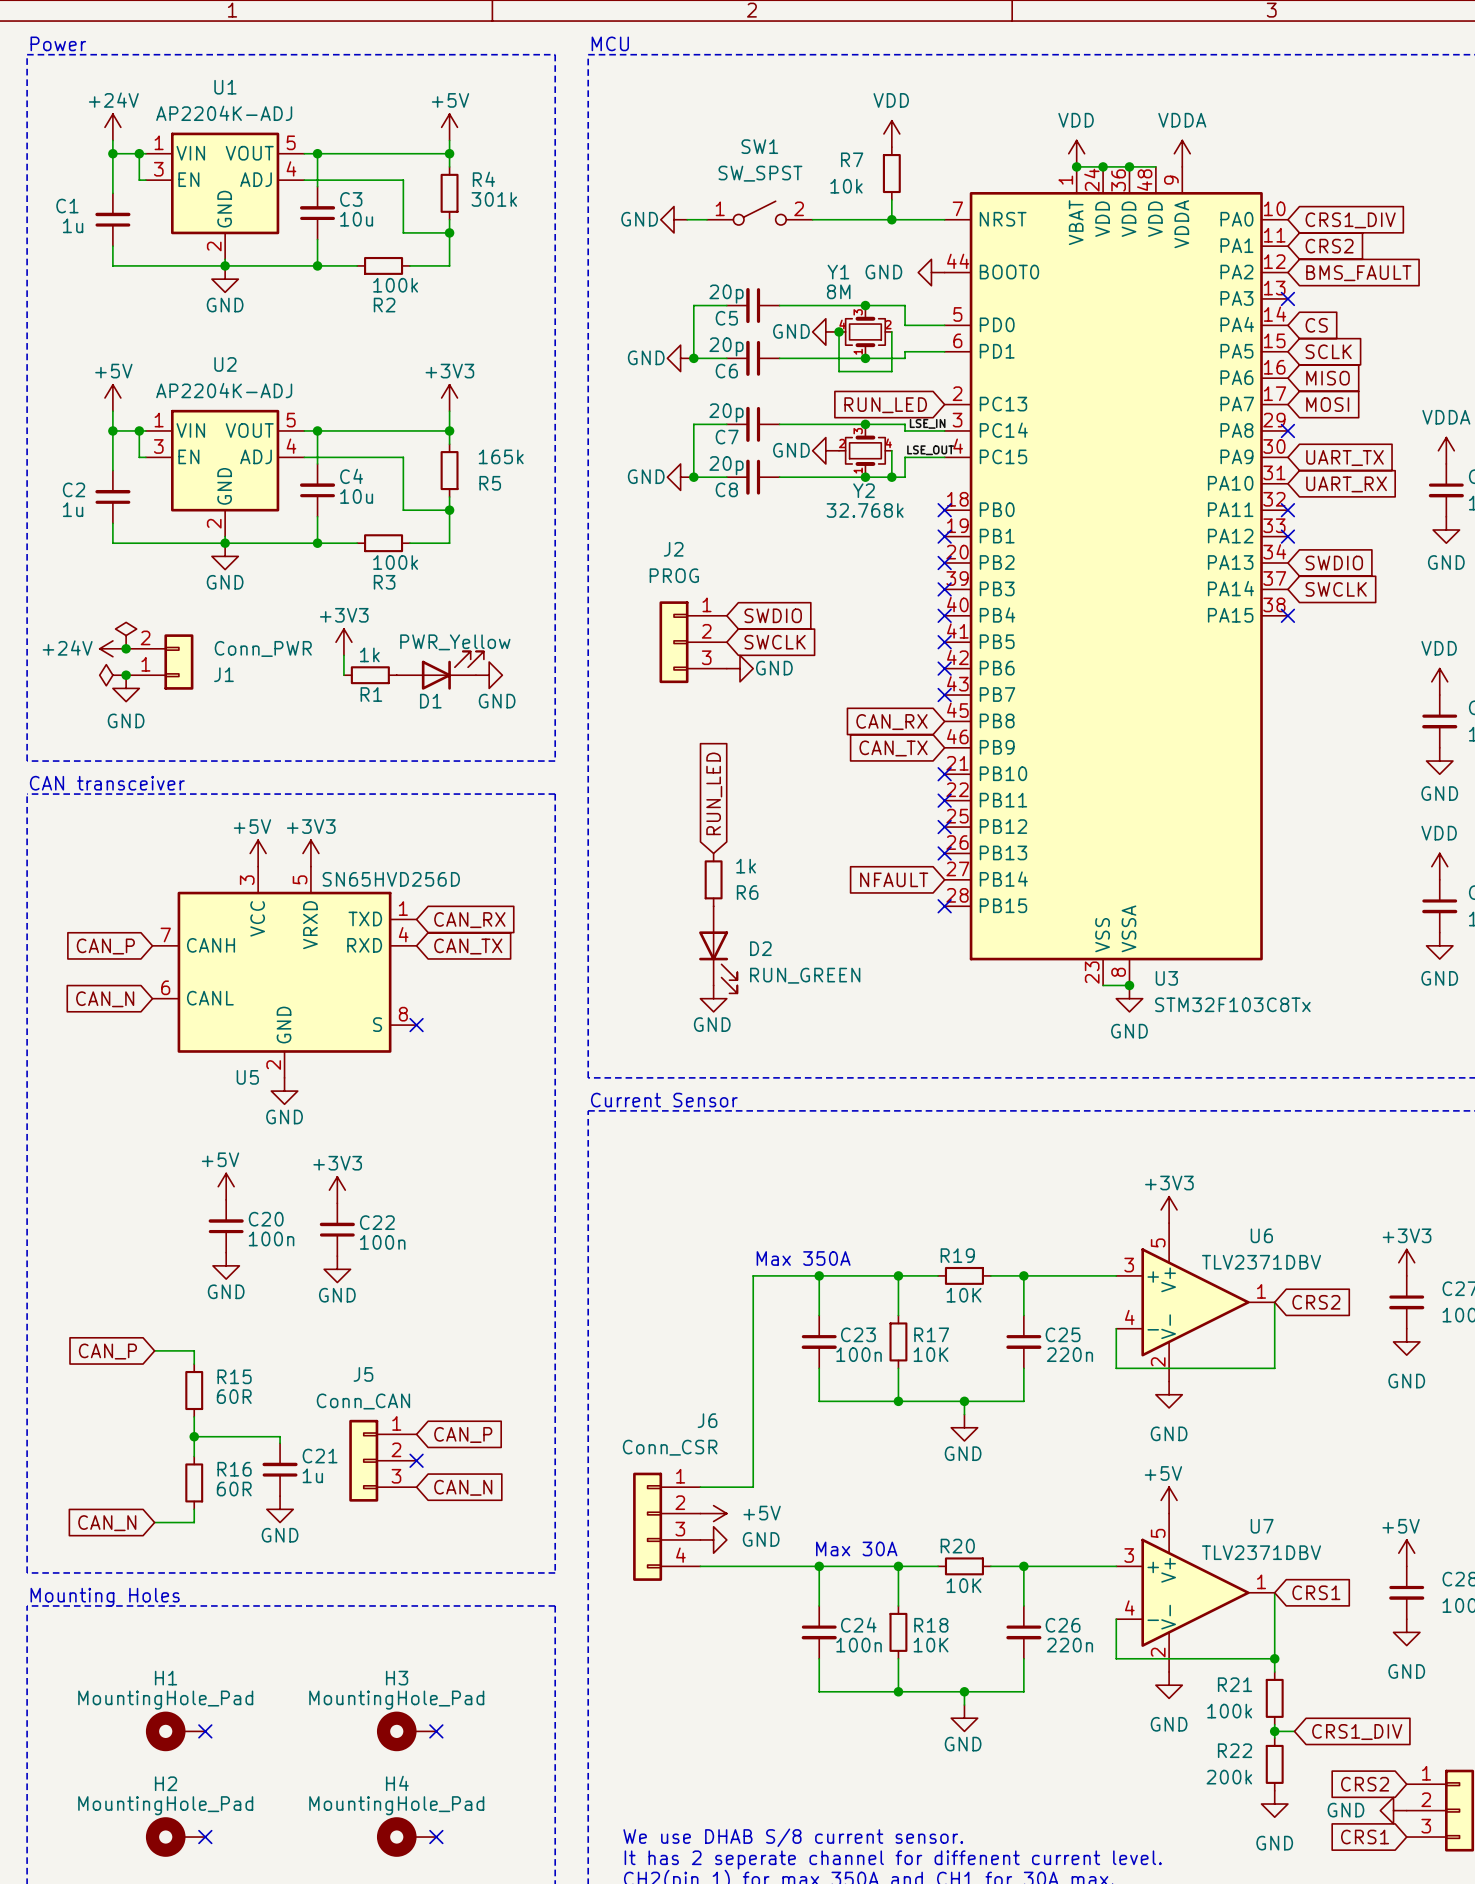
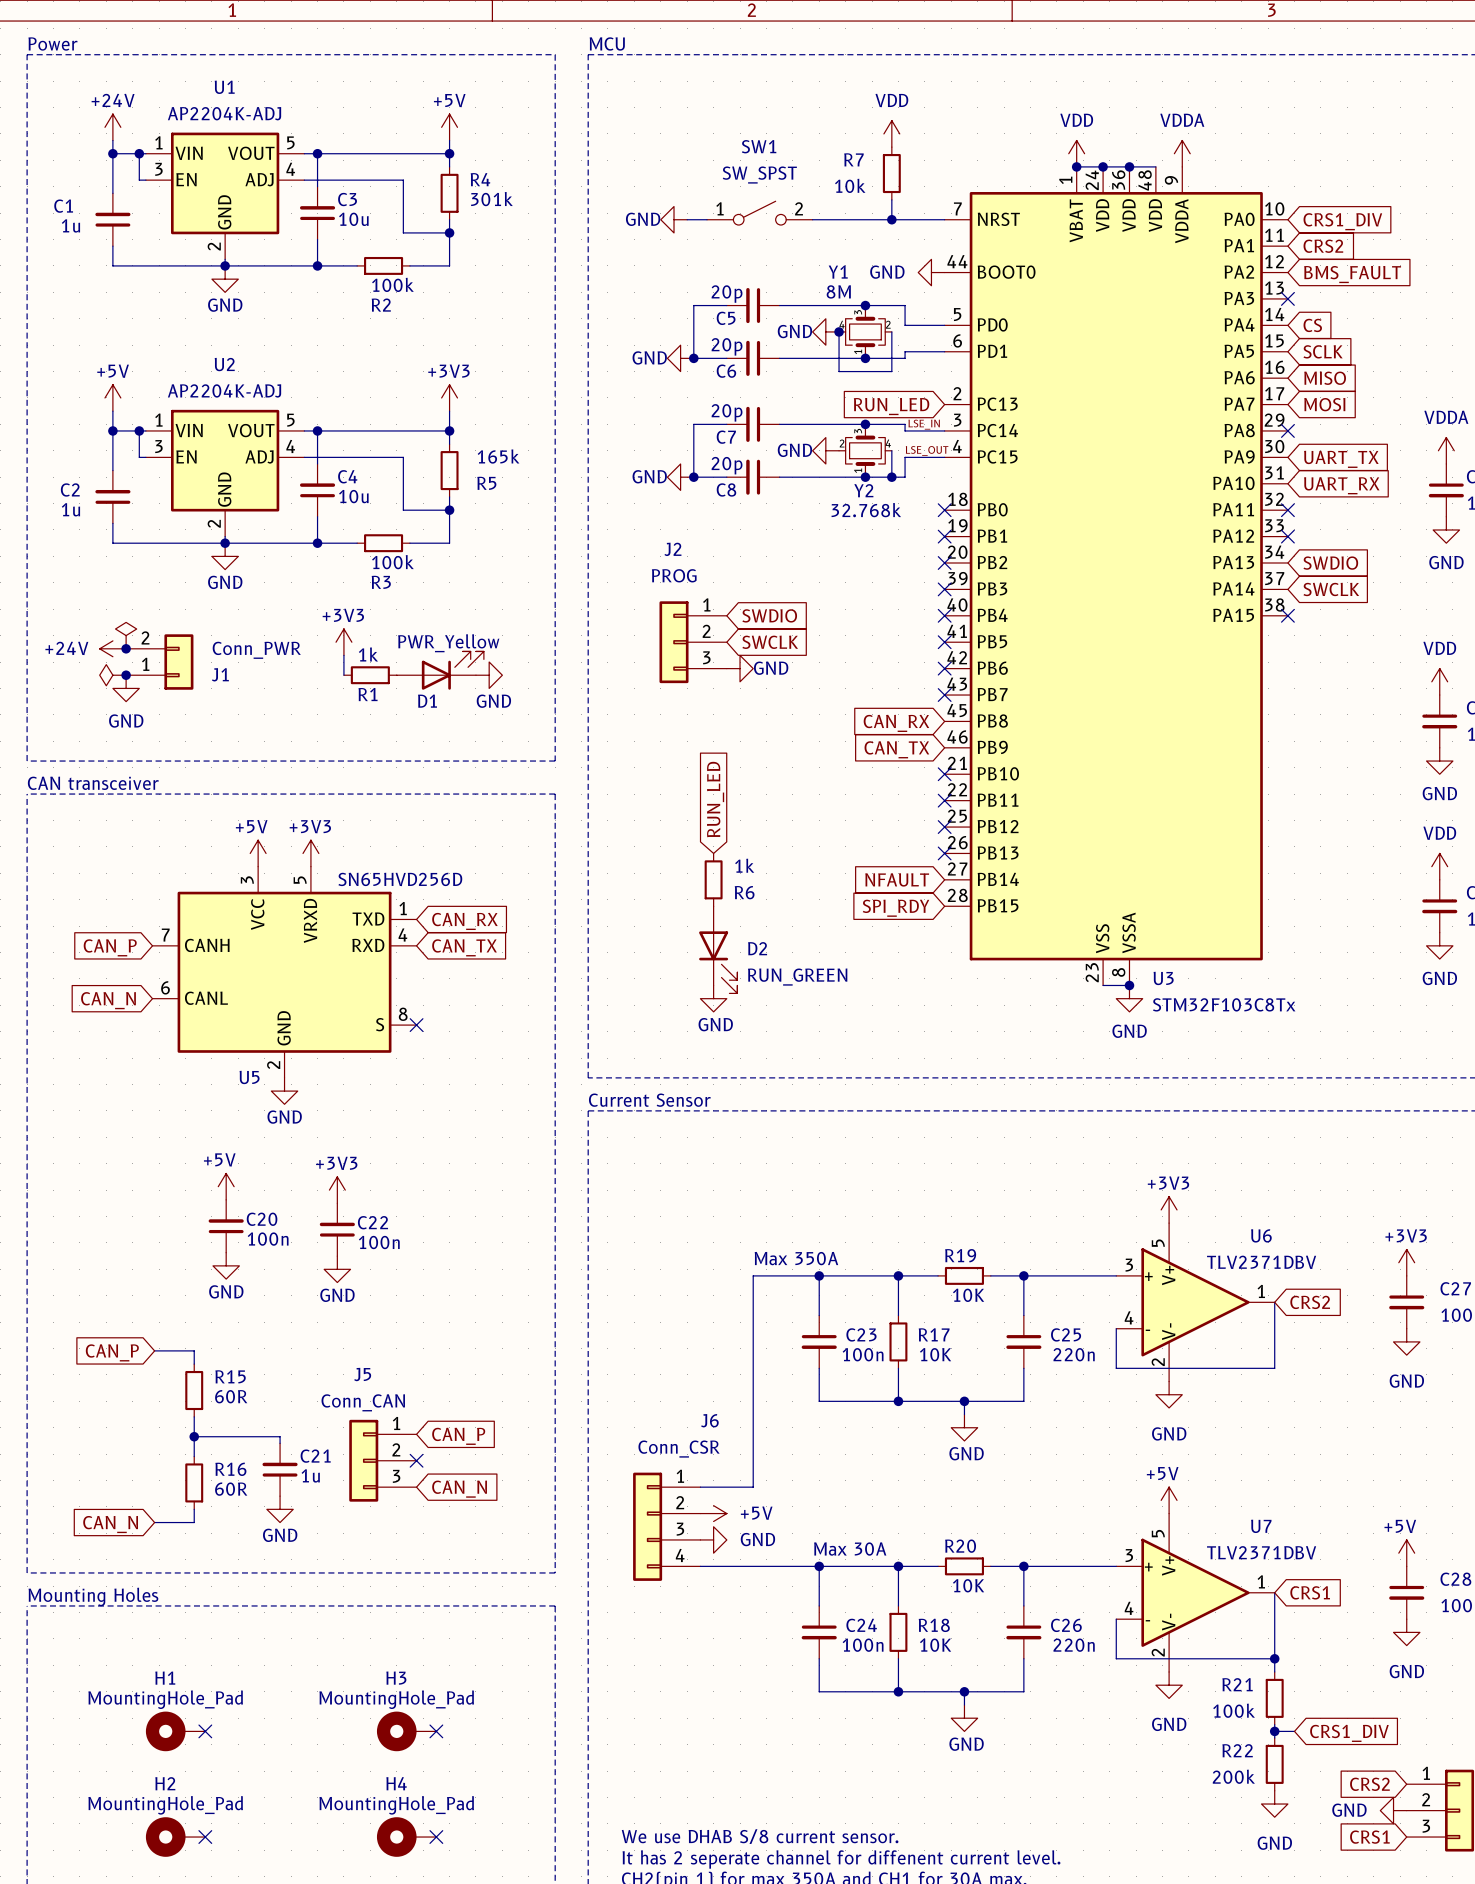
global label: none -> SPI_RDY (896, 908)
no-connect mark: (944, 906) -> none

